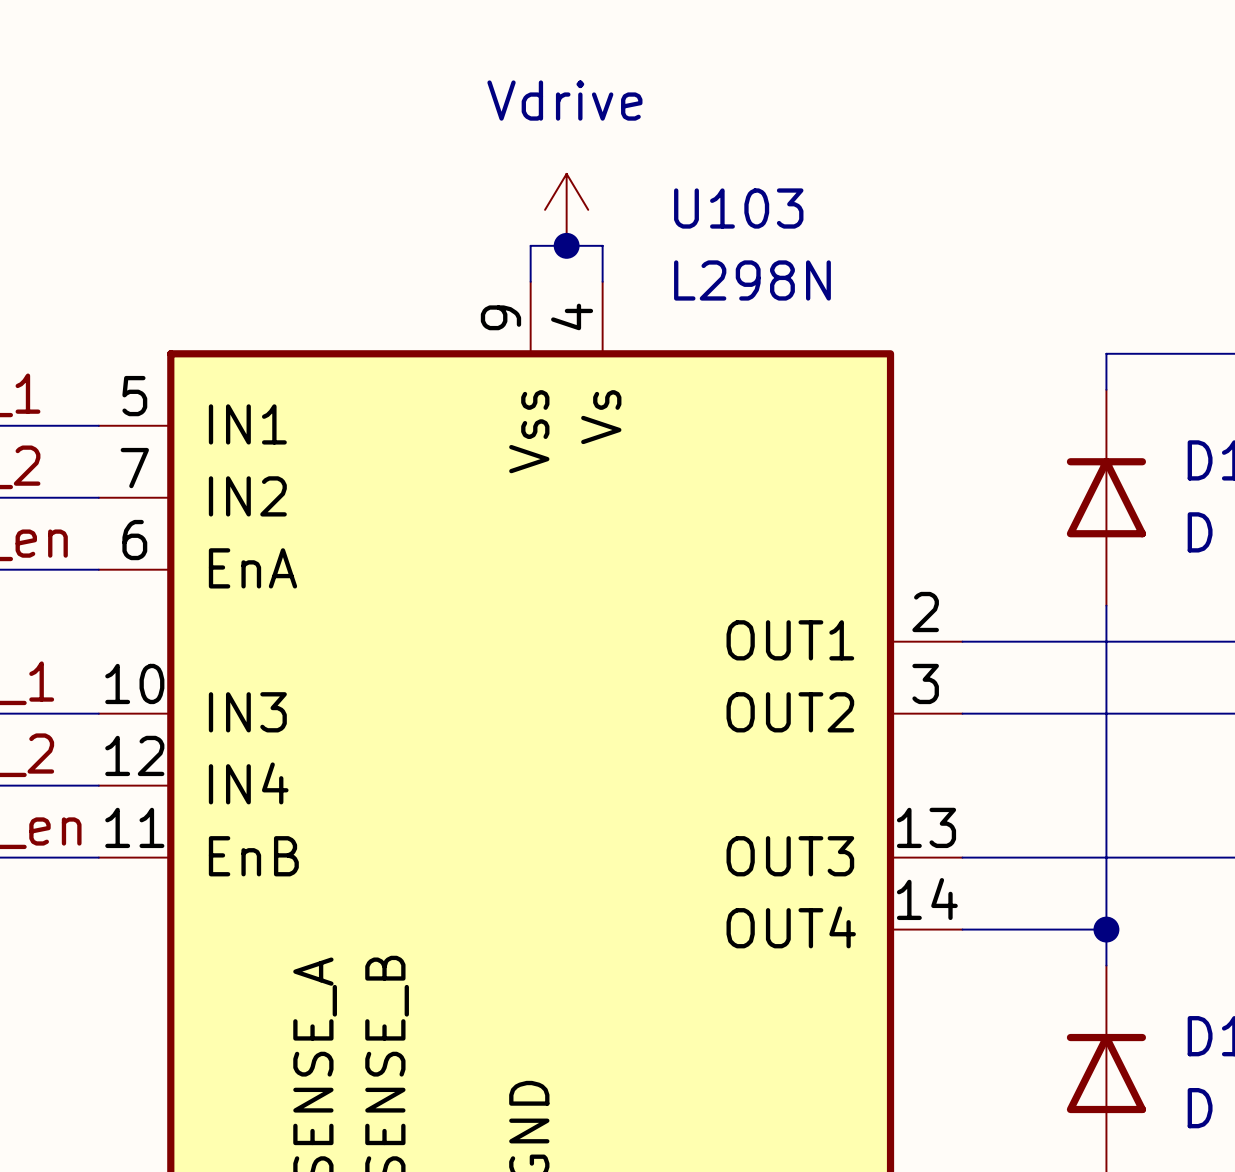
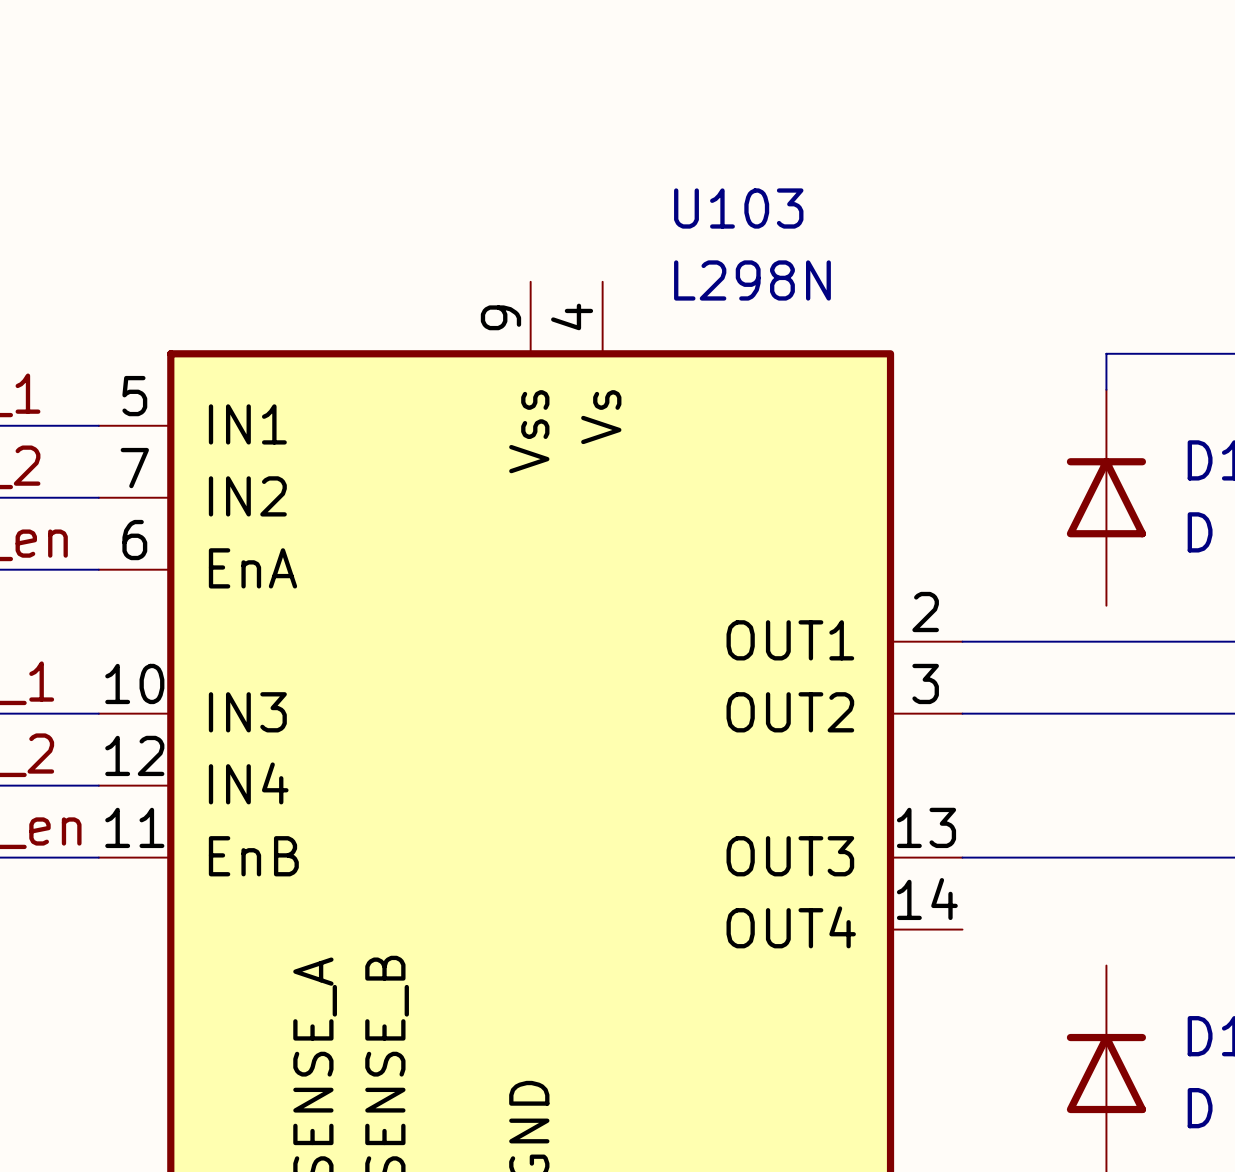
power symbol: Vdrive (566, 209) -> none
junction: (566, 245) -> none
wire: (530, 281) (530, 245) (602, 245) (602, 281) -> none
wire: (1106, 605) (1106, 965) -> none
wire: (962, 929) (1106, 929) -> none
junction: (1106, 929) -> none

